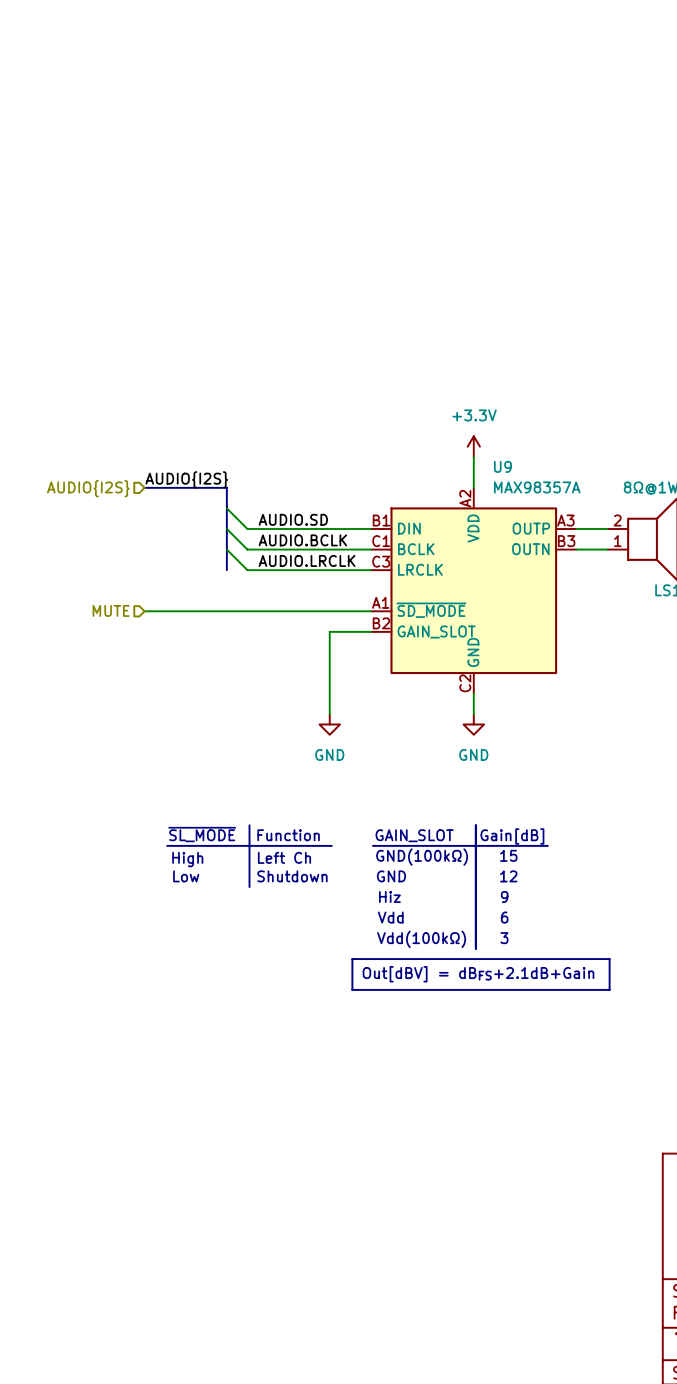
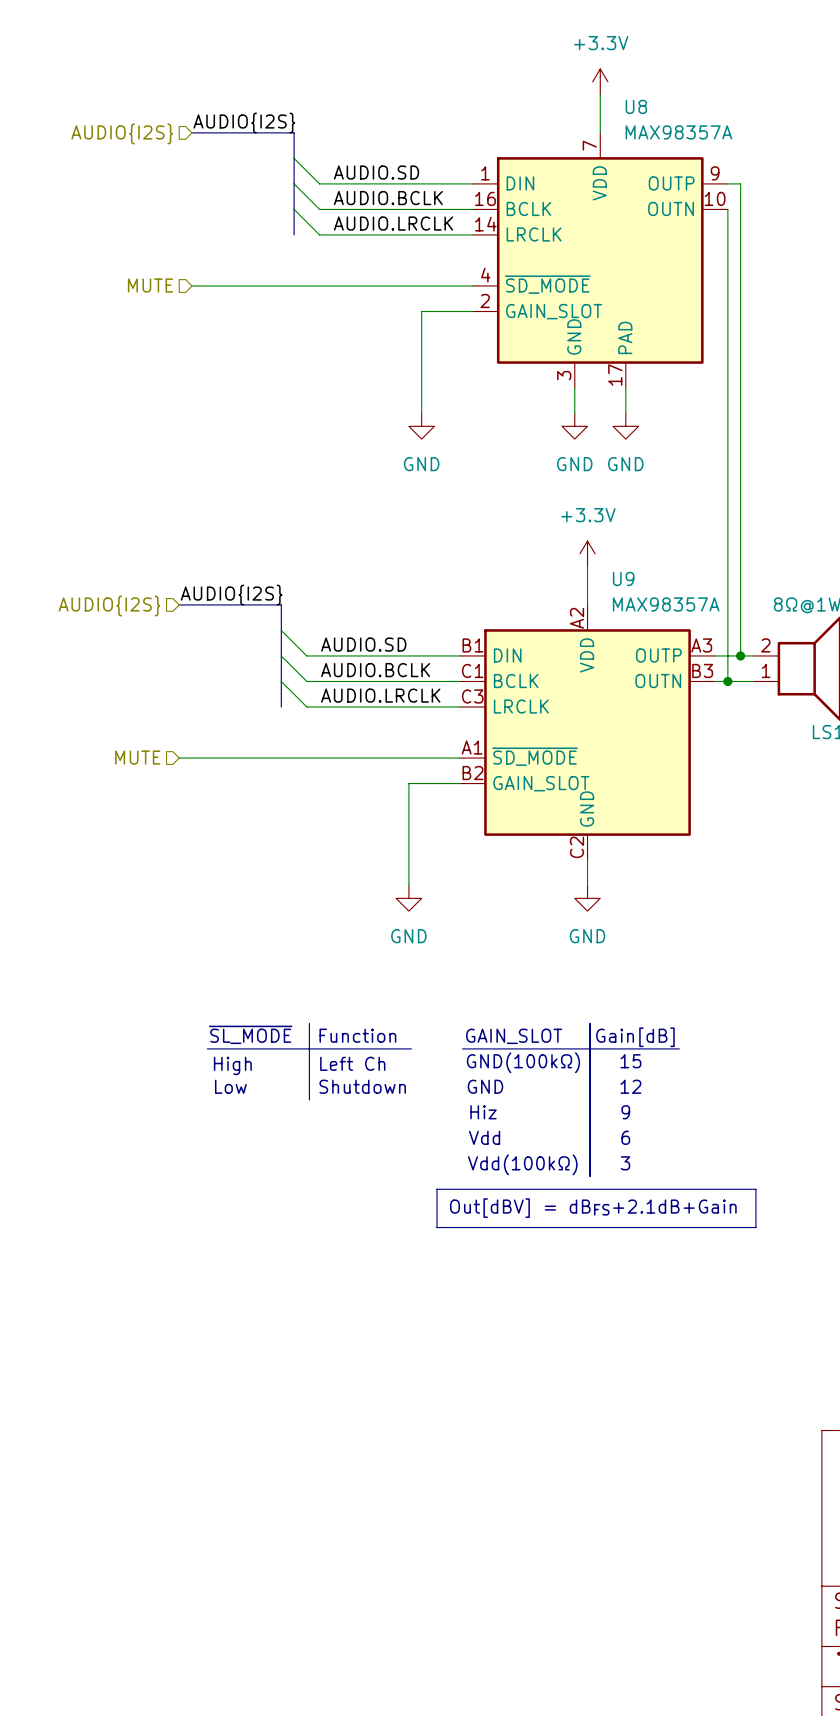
power symbol: none -> +3.3V (600, 81)
wire: none -> (600, 94) (600, 132)
label: none -> AUDIO{I2S} (244, 123)
bus: none -> (192, 132) (294, 132) (294, 234)
hierarchical label: none -> AUDIO{I2S} (122, 133)
wire: none -> (294, 158) (319, 183) (472, 183)
label: none -> AUDIO.SD (376, 172)
wire: none -> (294, 183) (319, 209) (472, 209)
wire: none -> (727, 183) (740, 183) (740, 655)
label: none -> AUDIO.BCLK (388, 198)
wire: none -> (294, 209) (319, 234) (472, 234)
wire: none -> (727, 209) (727, 681)
label: none -> AUDIO.LRCLK (393, 223)
U8: none -> MAX98357A (600, 260)
hierarchical label: none -> MUTE (150, 285)
wire: none -> (192, 285) (472, 285)
wire: none -> (472, 311) (421, 311) (421, 413)
wire: none -> (574, 388) (574, 413)
wire: none -> (625, 388) (625, 413)
power symbol: none -> GND (421, 426)
power symbol: none -> GND (574, 426)
power symbol: none -> GND (625, 426)
junction: none -> (740, 655)
junction: none -> (727, 681)

